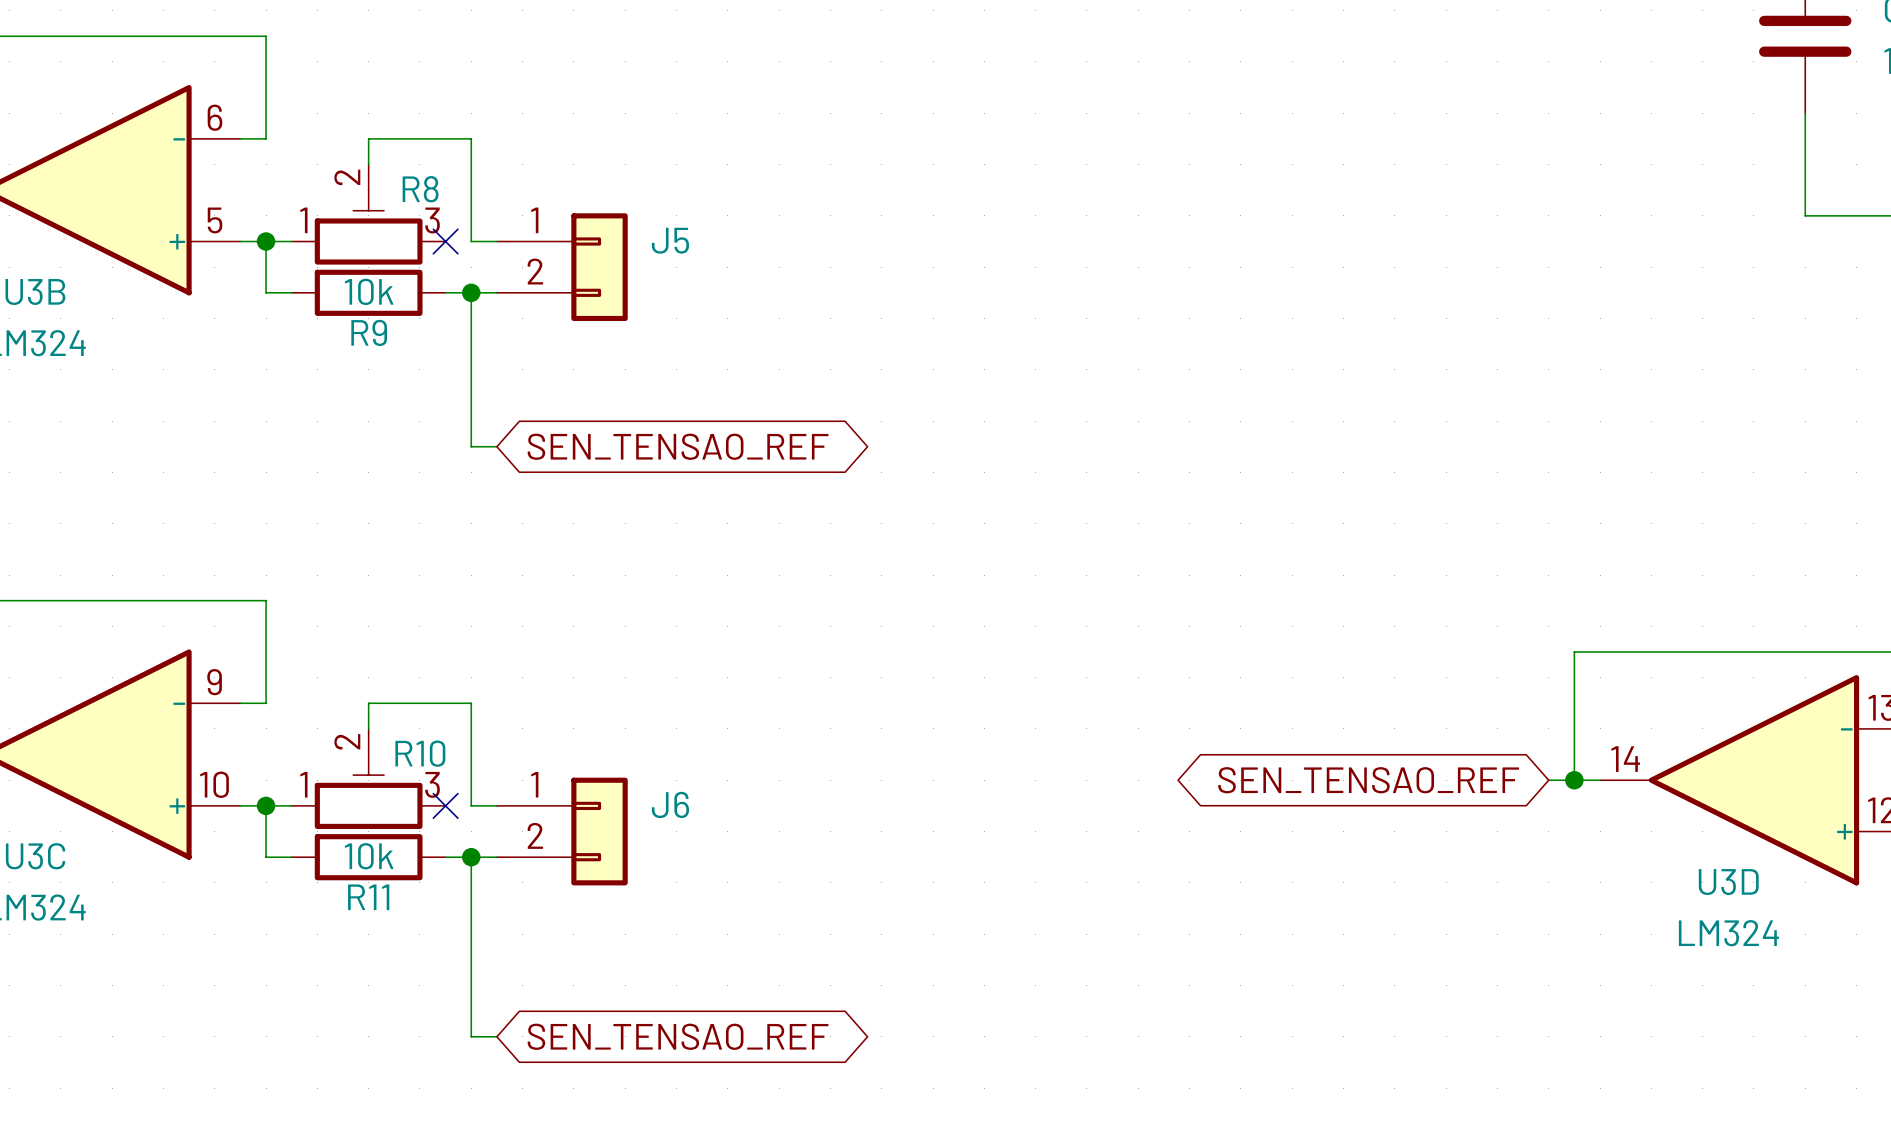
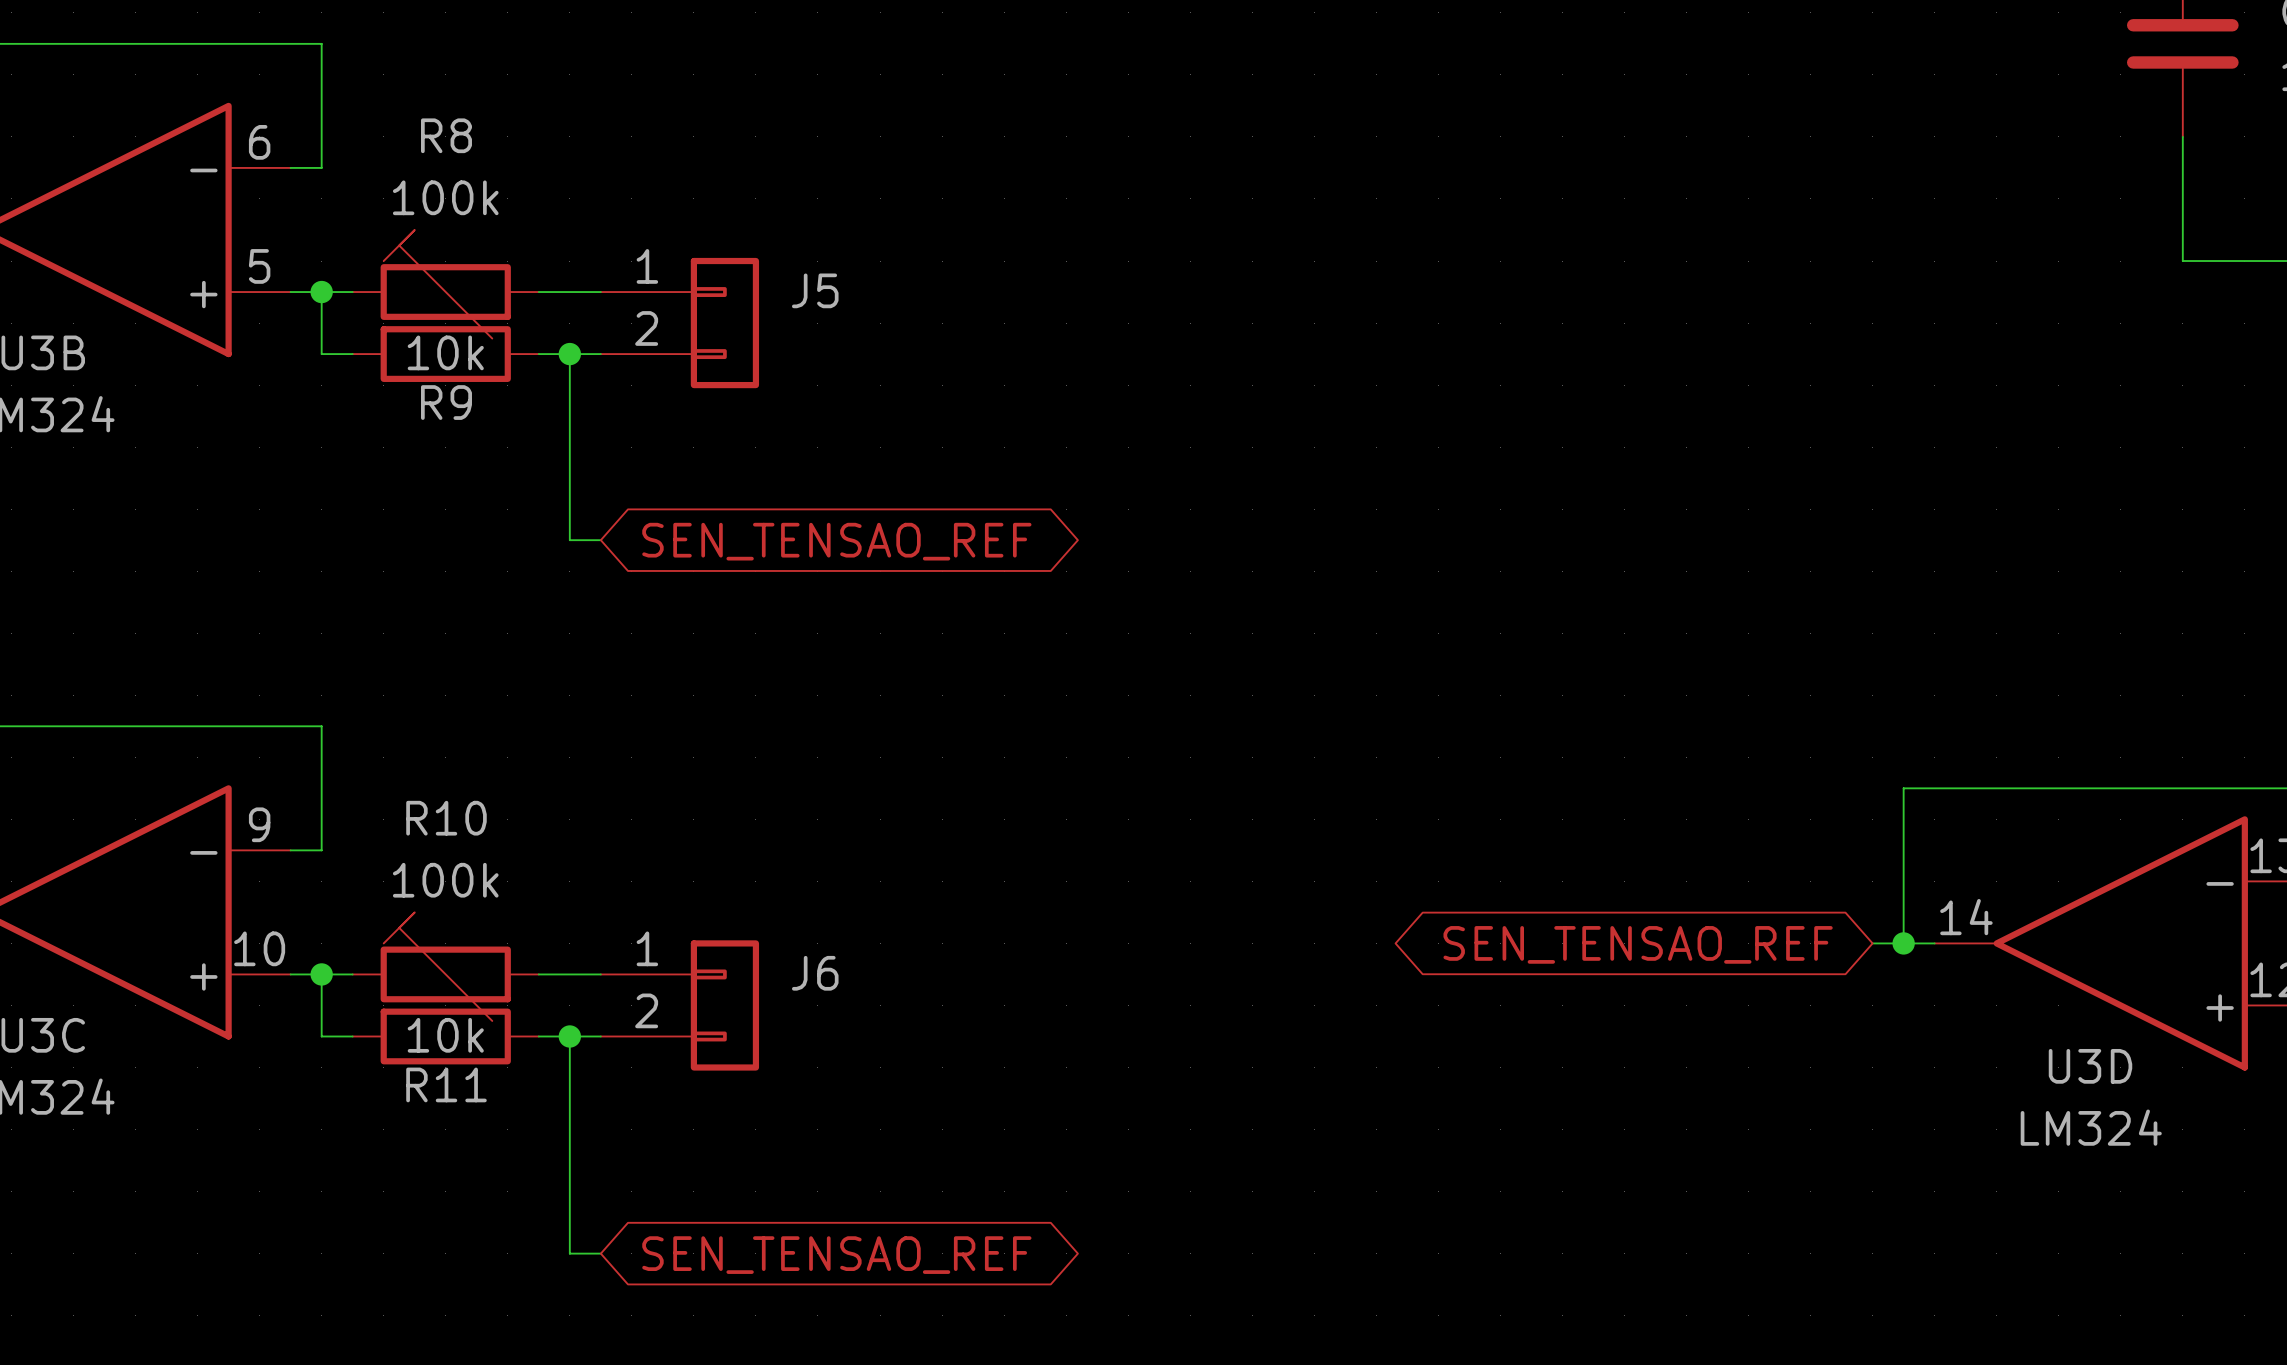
R8 value: none -> 100k (445, 197)
R8 symbol: [291, 164, 446, 265] -> [352, 229, 539, 339]
wire: (368, 164) (368, 138) (471, 138) (471, 241) -> (538, 292) (569, 292)
R8 name position: R8 (420, 189) -> R8 (446, 135)
no-connect mark: (445, 241) -> none
R10 value: none -> 100k (445, 880)
R10 symbol: [291, 728, 446, 829] -> [352, 912, 539, 1021]
wire: (368, 728) (368, 703) (471, 703) (471, 805) -> (538, 974) (569, 974)
R10 name position: R10 (420, 753) -> R10 (446, 818)
no-connect mark: (445, 805) -> none

